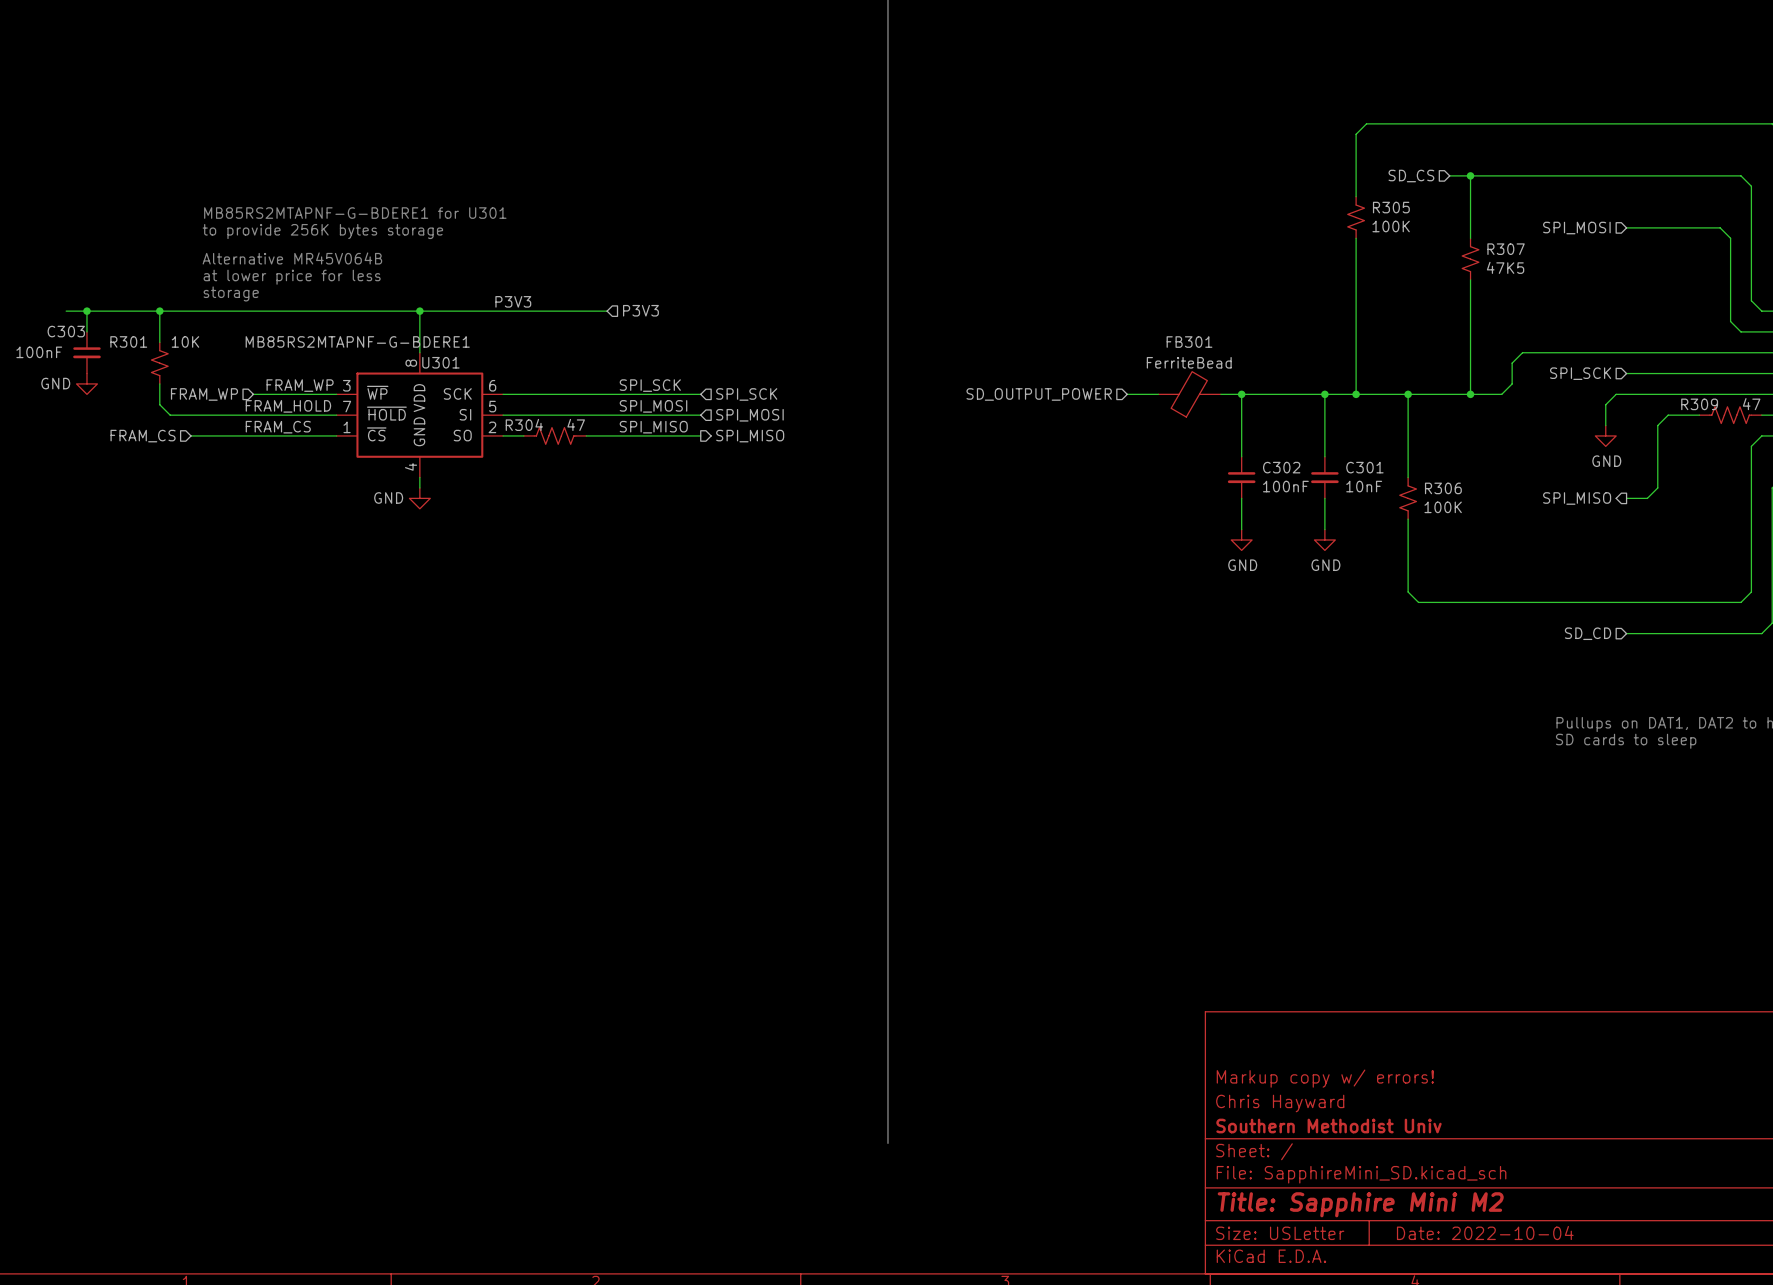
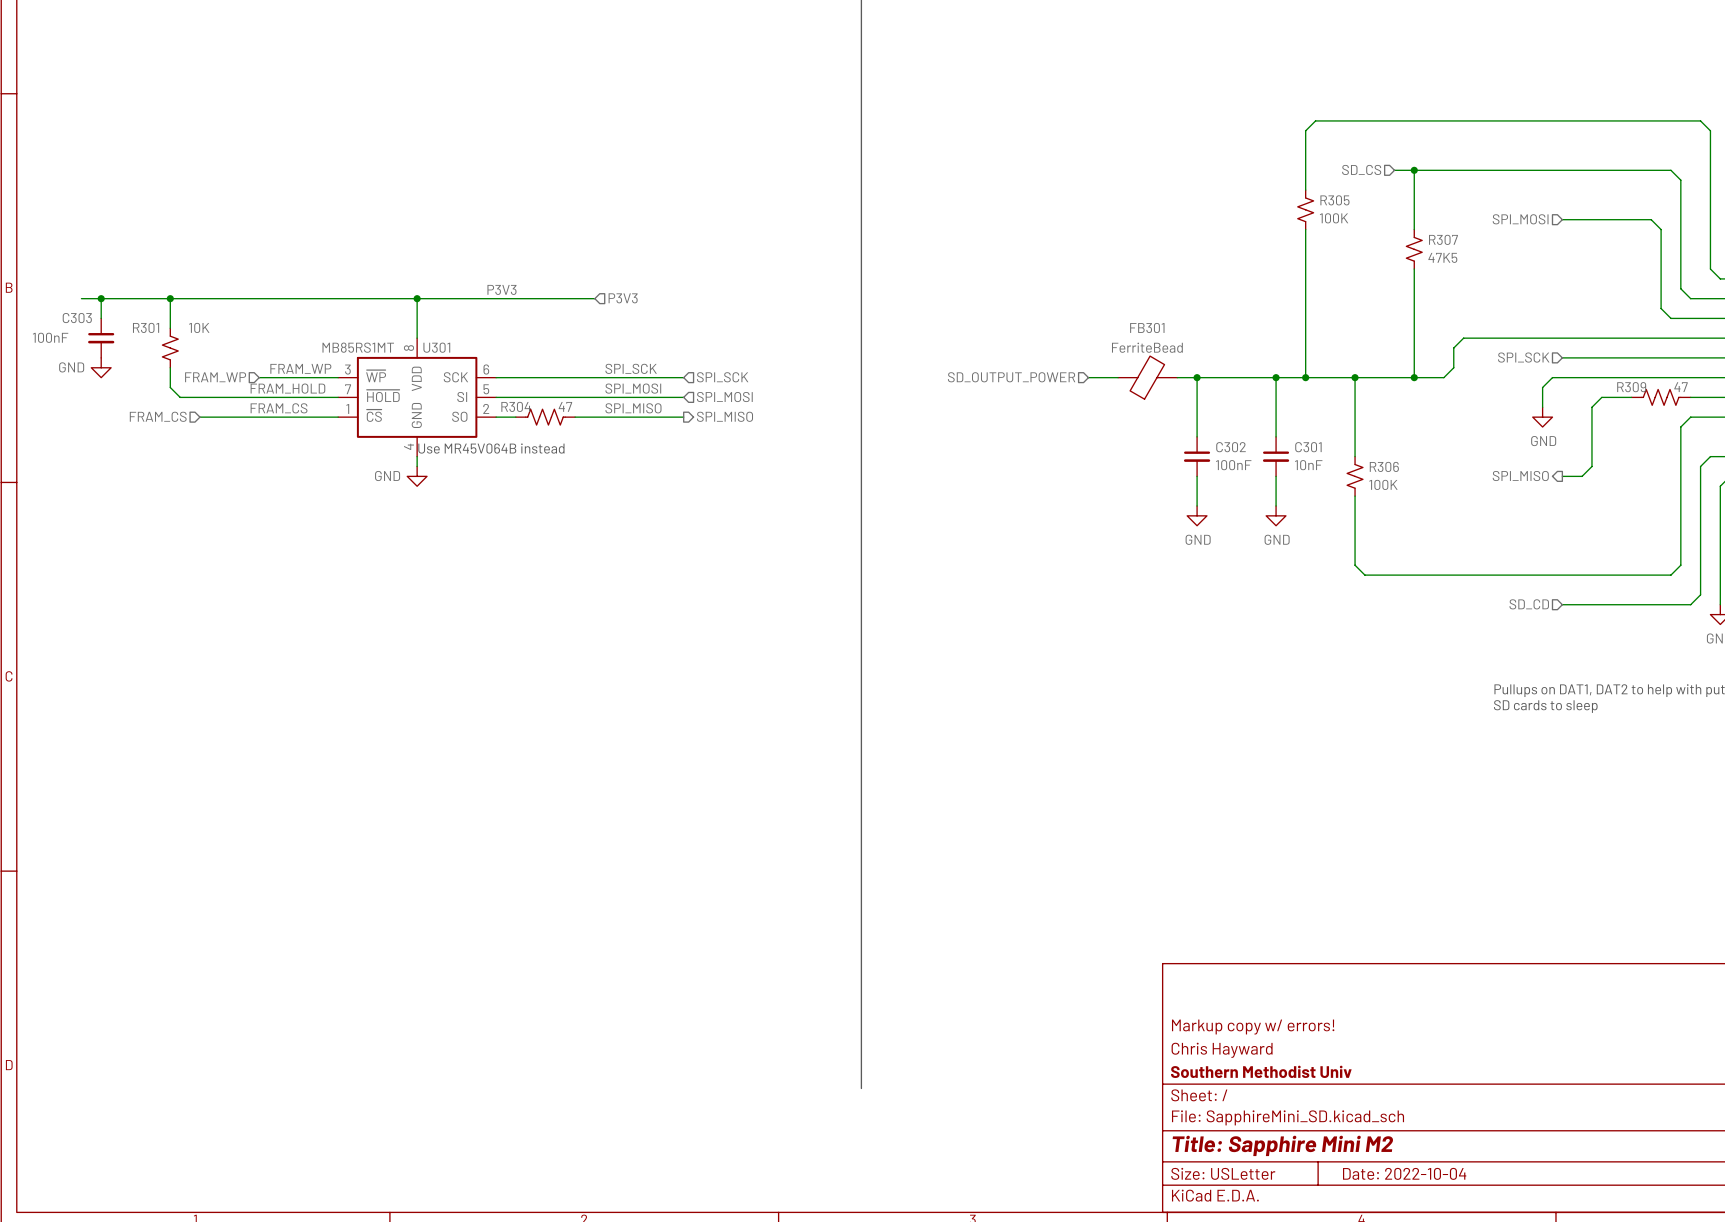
text: MB85RS2MTAPNF-G-BDERE1 for U301 (355, 213) -> none
text: to provide 256K bytes storage (322, 231) -> none
text: Alternative MR45V064B (292, 258) -> none
text: at lower price for less (292, 277) -> none
text: storage (231, 293) -> none
U301 value: MB85RS2MTAPNF-G-BDERE1 (357, 341) -> MB85RS1MT (358, 347)
text: none -> Use MR45V064B instead (491, 448)

